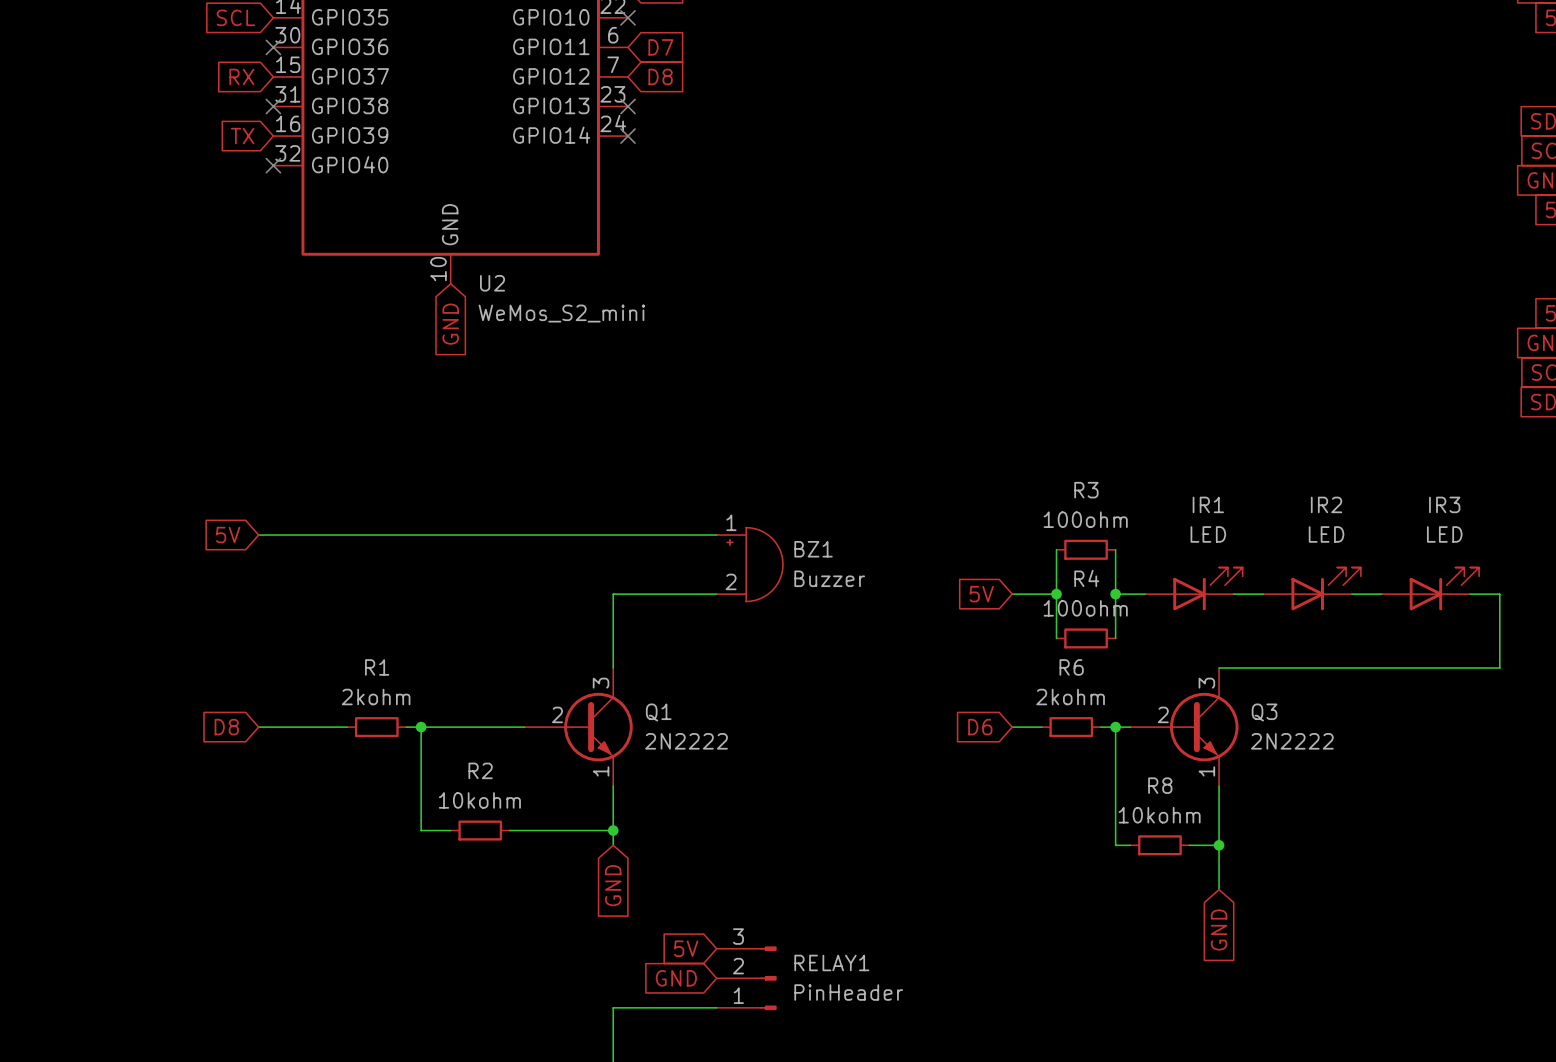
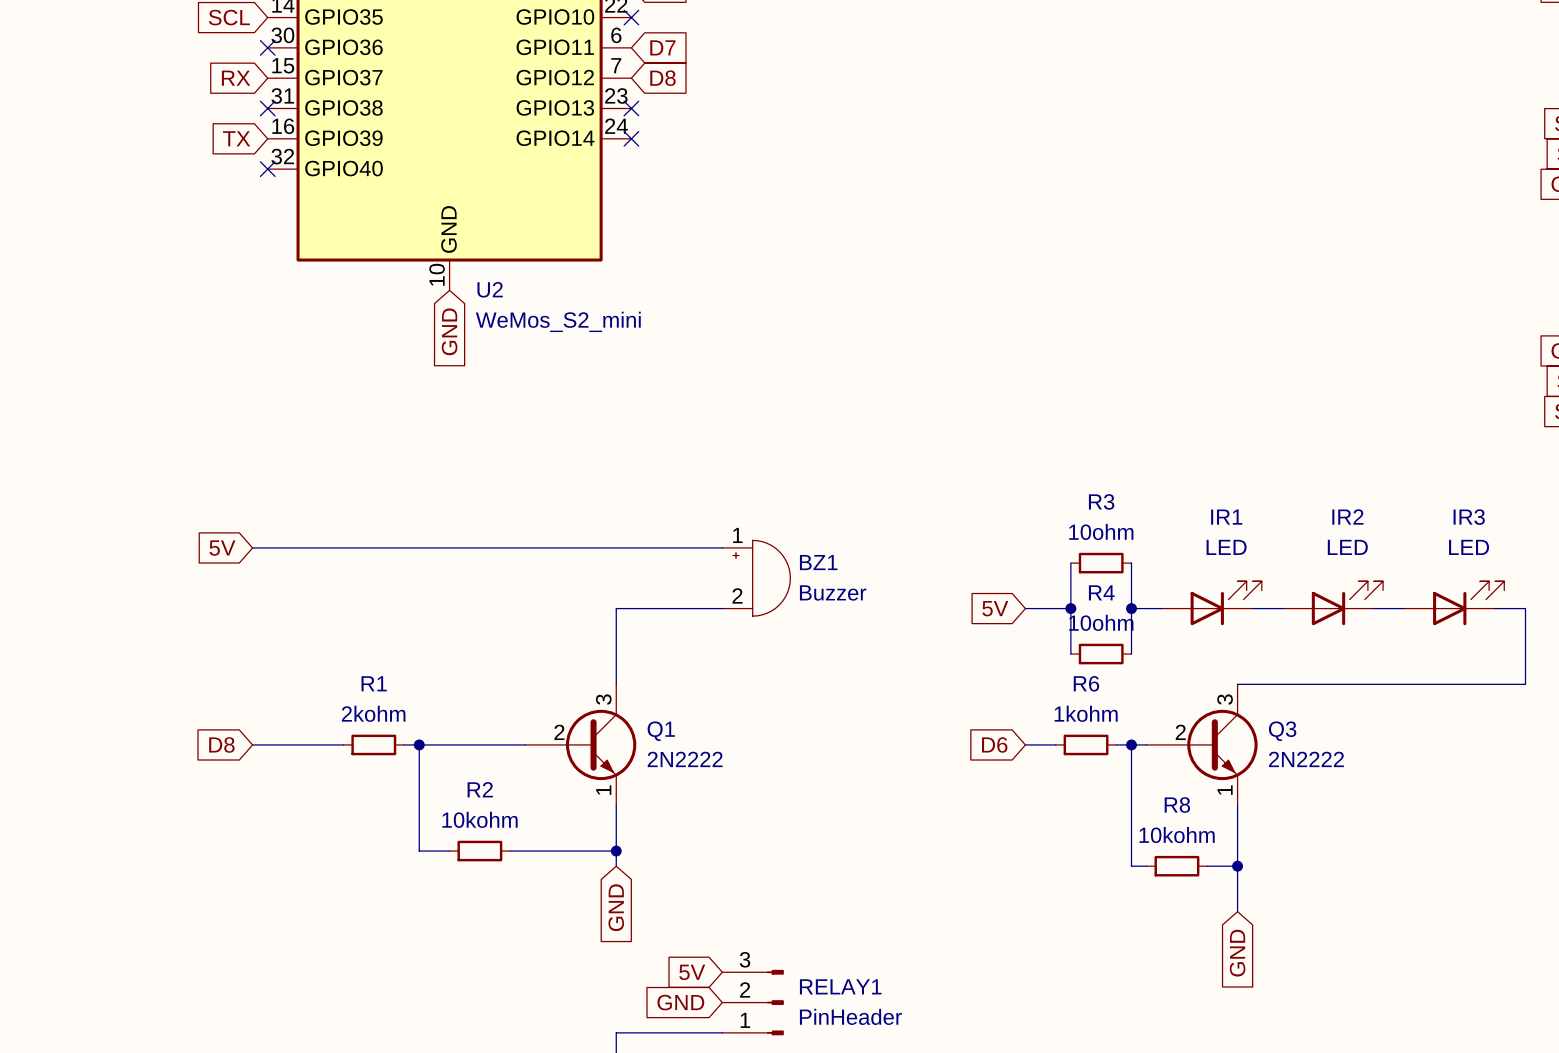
R3 value: 100ohm (1085, 519) -> 10ohm (1101, 531)
R4 value: 100ohm (1085, 608) -> 10ohm (1101, 622)
R6 value: 2kohm (1070, 697) -> 1kohm (1086, 713)

